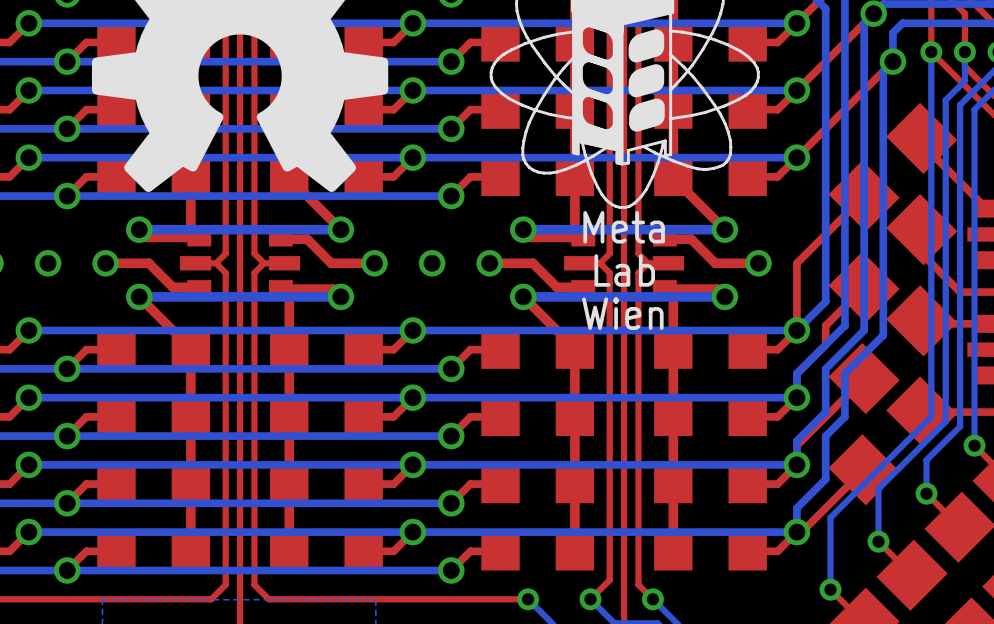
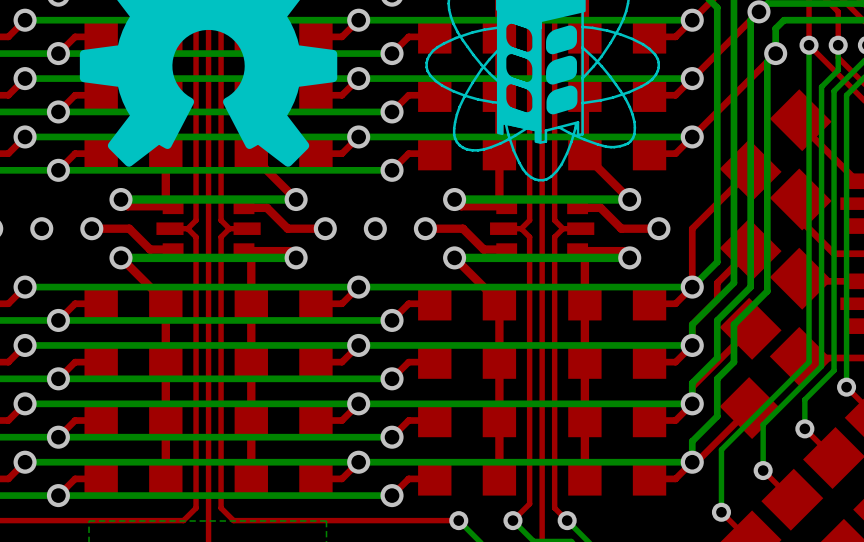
text: Meta (624, 227) -> none
text: Lab (624, 270) -> none
text: Wien (622, 313) -> none

